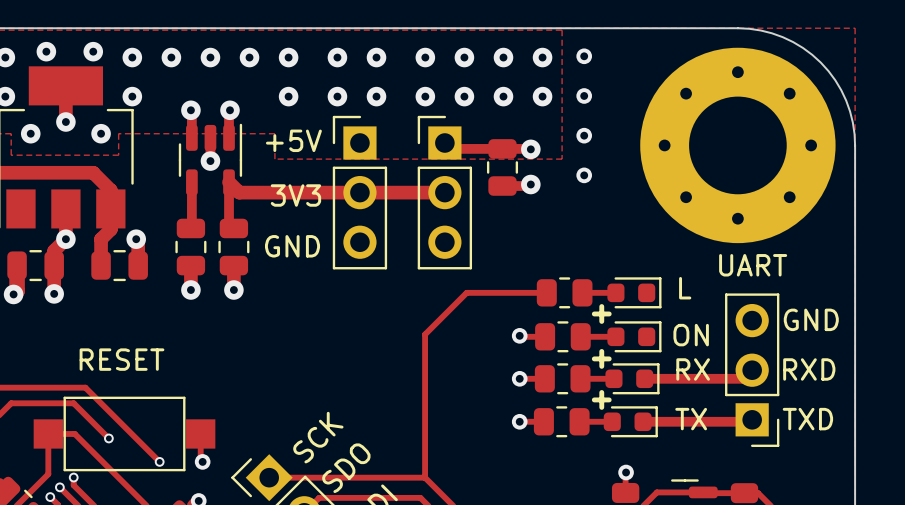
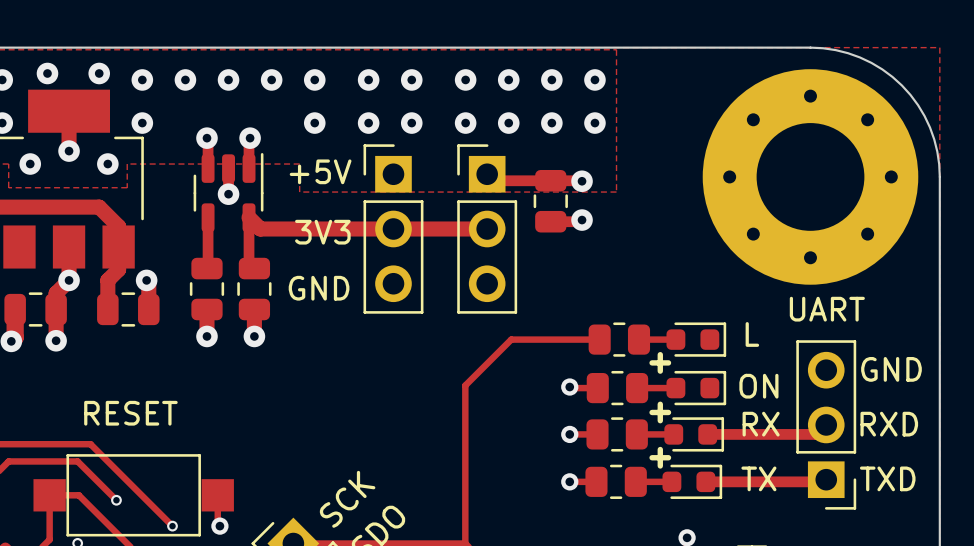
via: (584, 56) -> none
via: (584, 95) -> none
via: (584, 135) -> none
via: (584, 175) -> none

